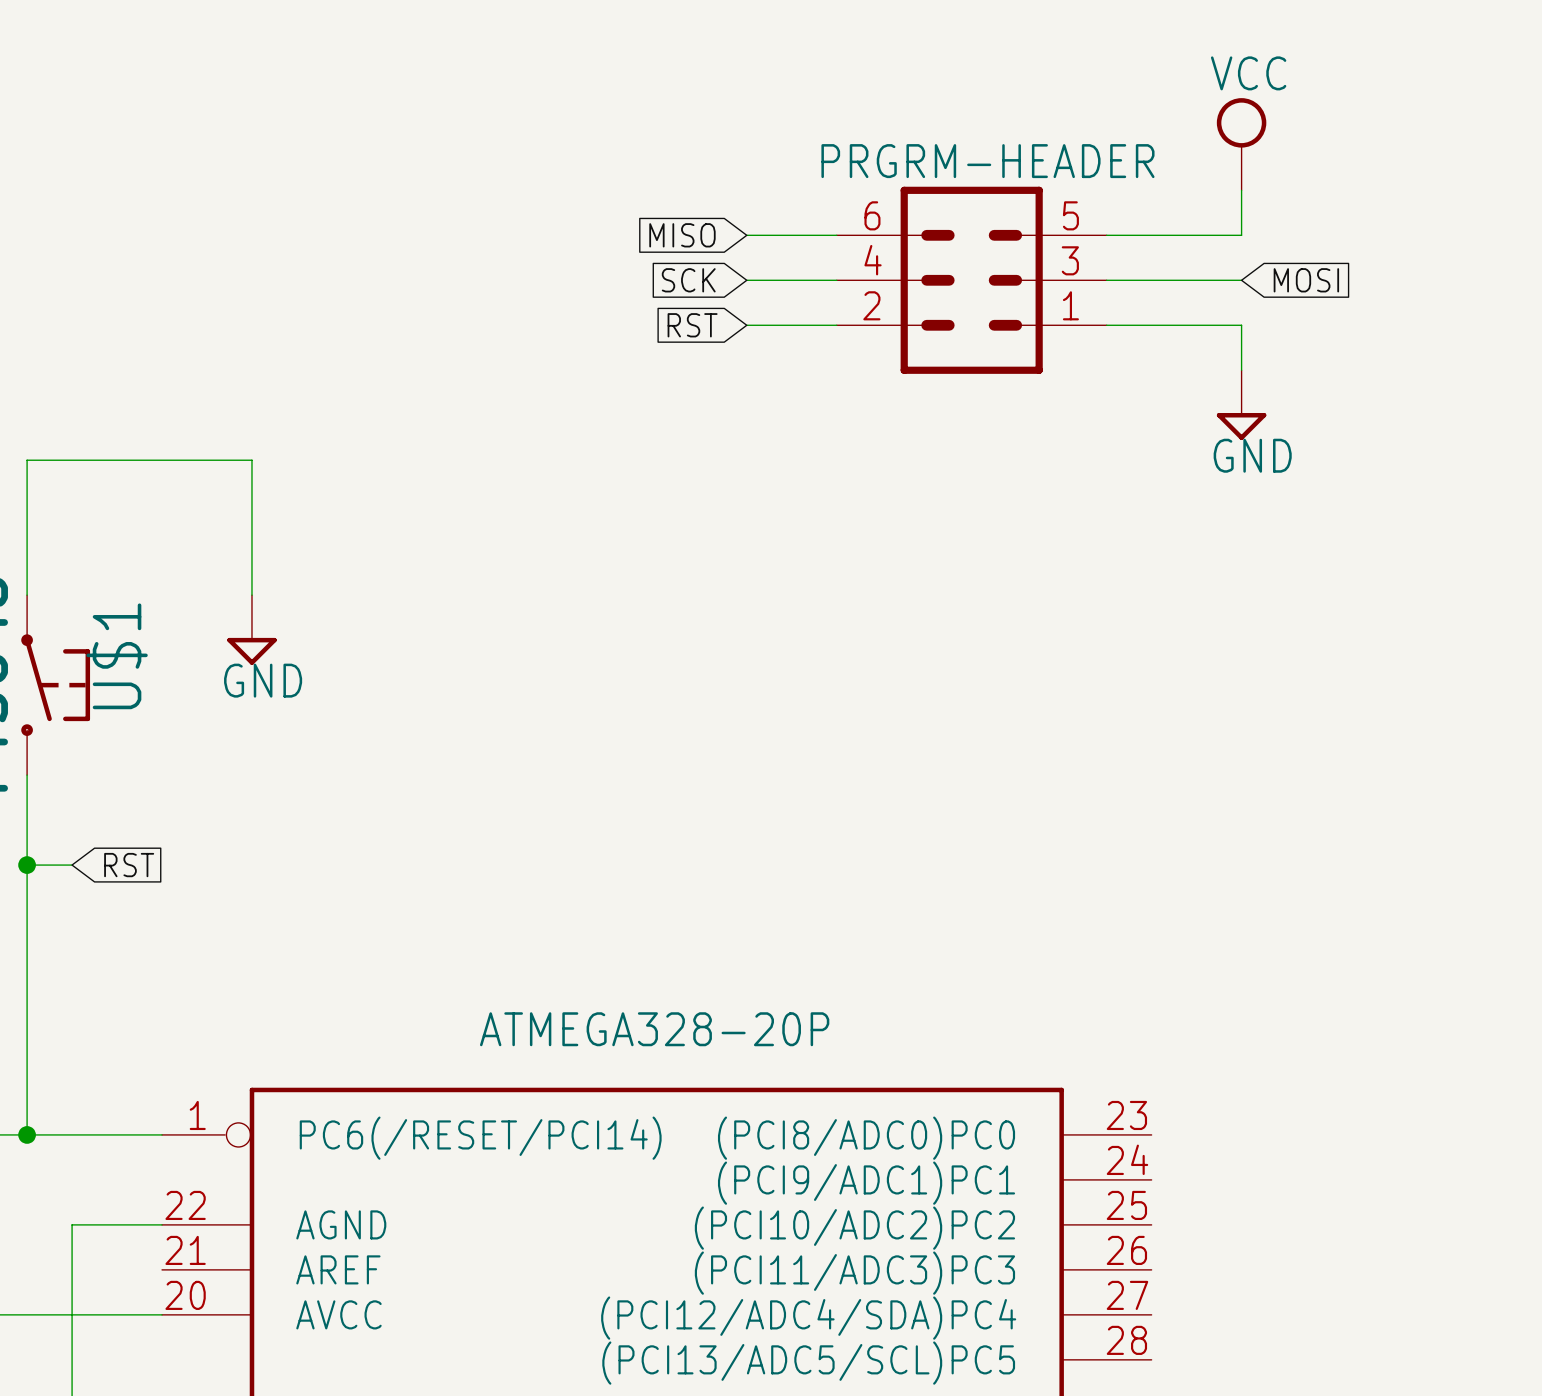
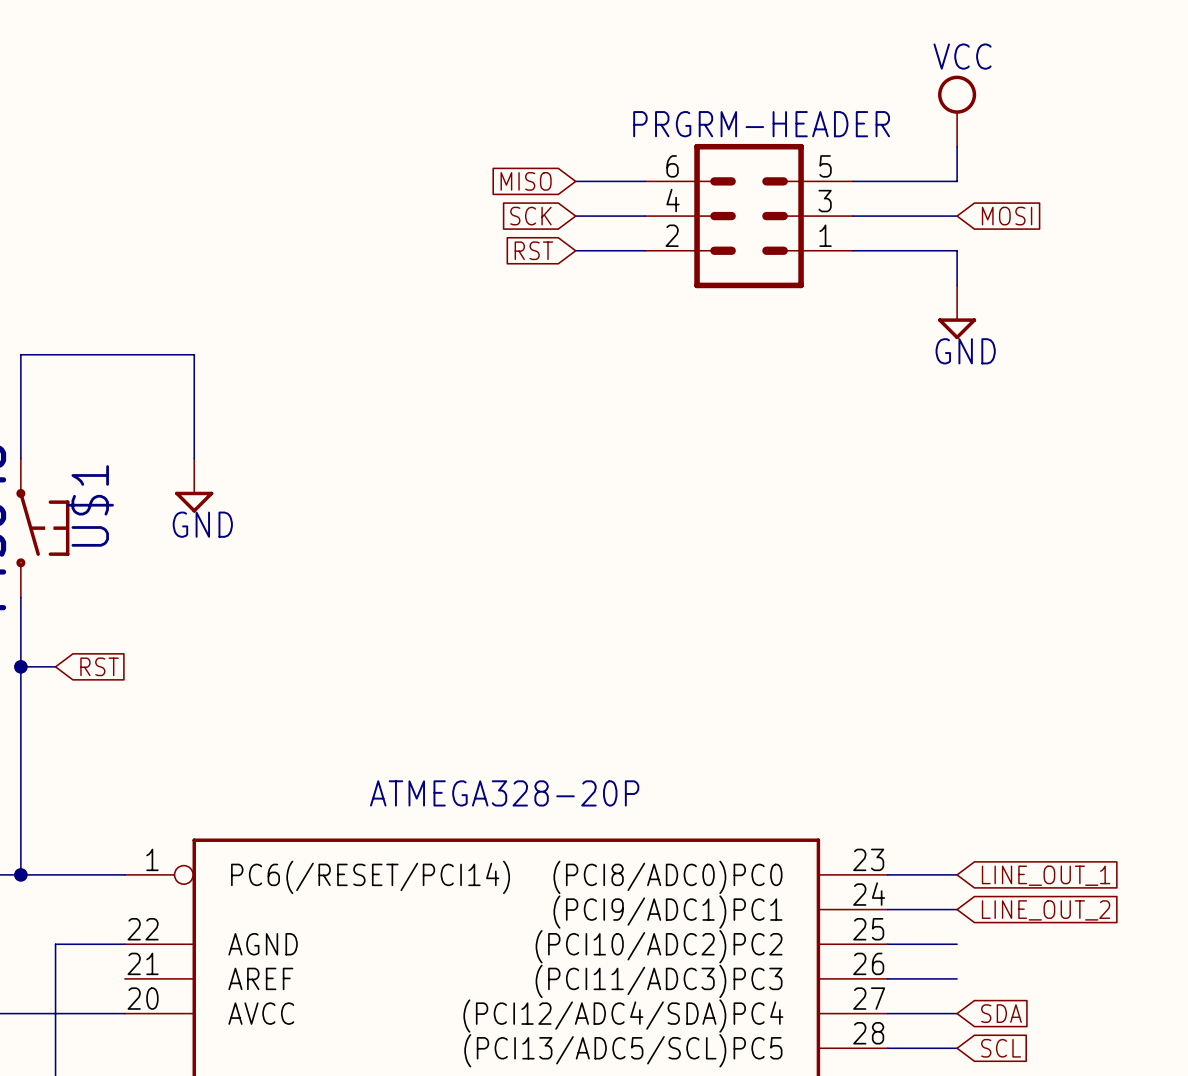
wire: none -> (887, 874) (957, 874)
global label: none -> LINE_OUT_1 (1046, 875)
wire: none -> (887, 909) (957, 909)
global label: none -> LINE_OUT_2 (1046, 910)
wire: none -> (887, 944) (957, 944)
wire: none -> (887, 978) (957, 978)
wire: none -> (887, 1013) (957, 1013)
global label: none -> SDA (1001, 1013)
wire: none -> (887, 1048) (957, 1048)
global label: none -> SCL (1001, 1048)

